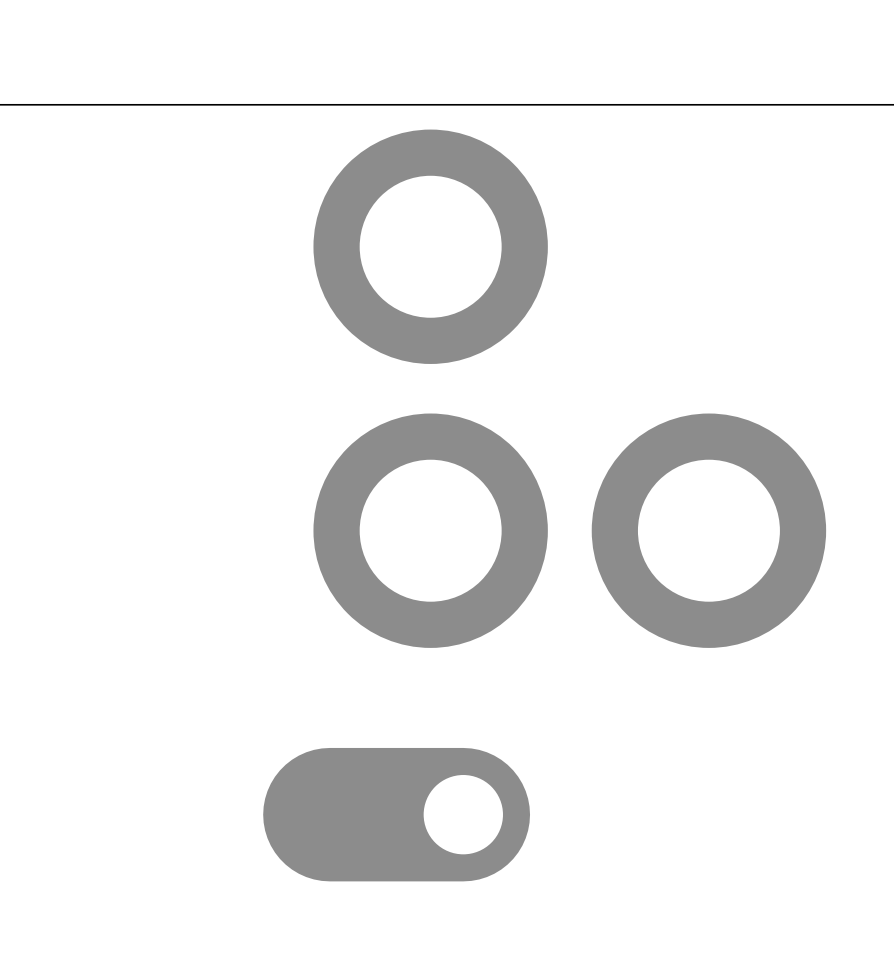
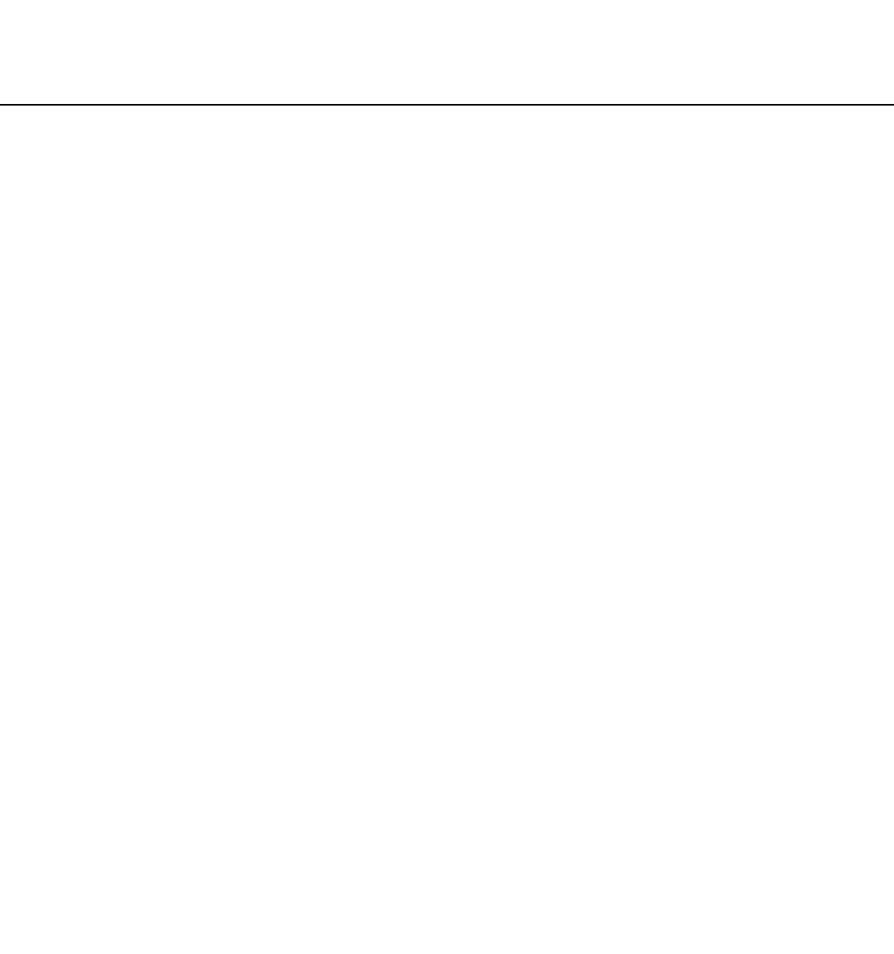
part: (430, 246) -> none
part: (430, 530) -> none
part: (708, 530) -> none
part: (396, 814) -> none

